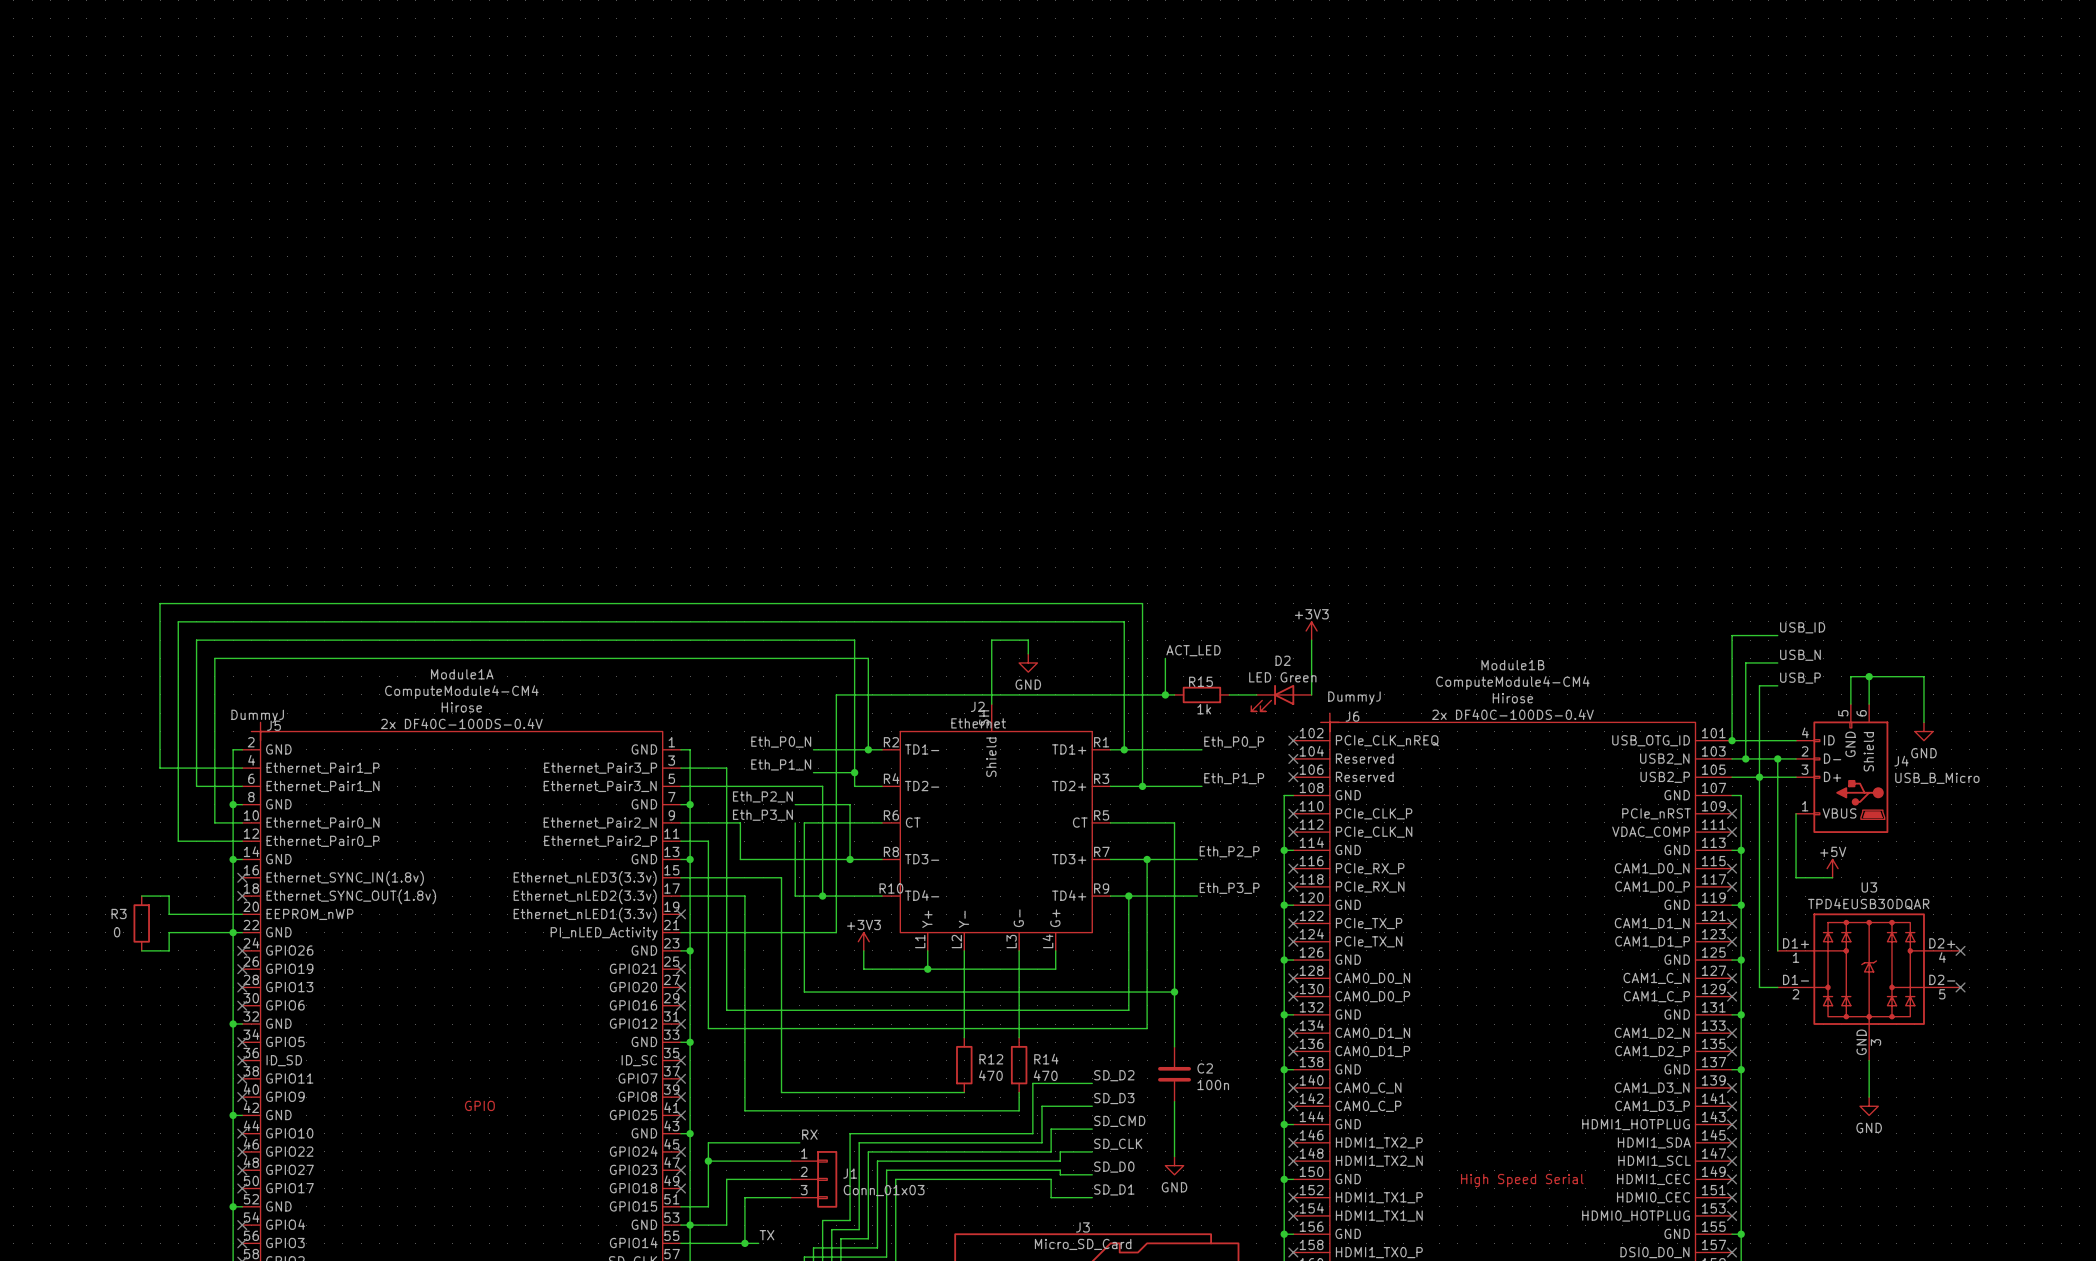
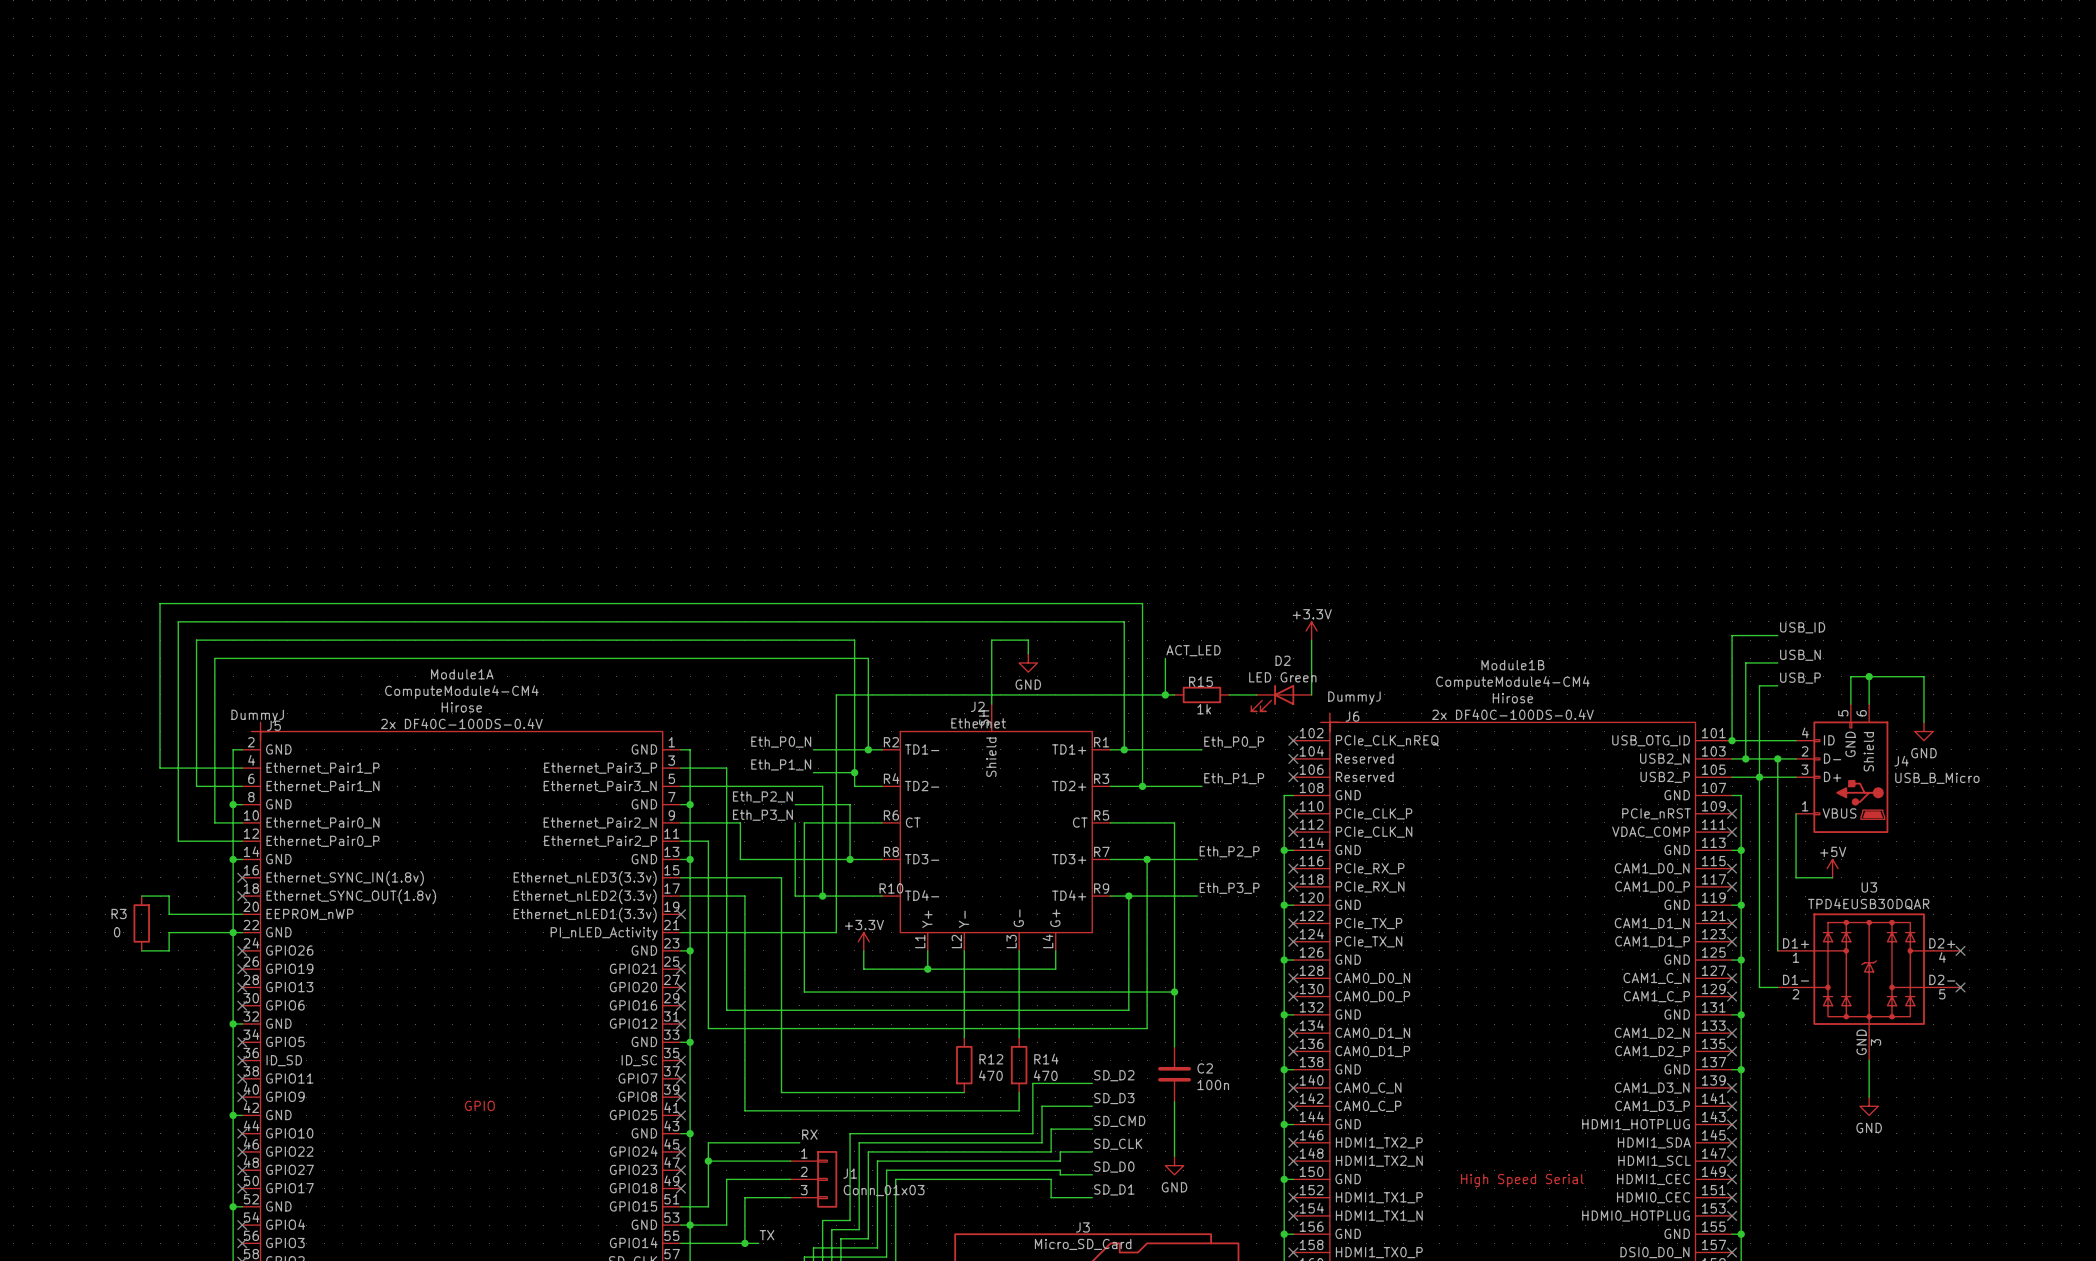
power symbol: +3V3 (1311, 630) -> +3.3V (1311, 630)
power symbol: +3V3 (863, 941) -> +3.3V (863, 941)

